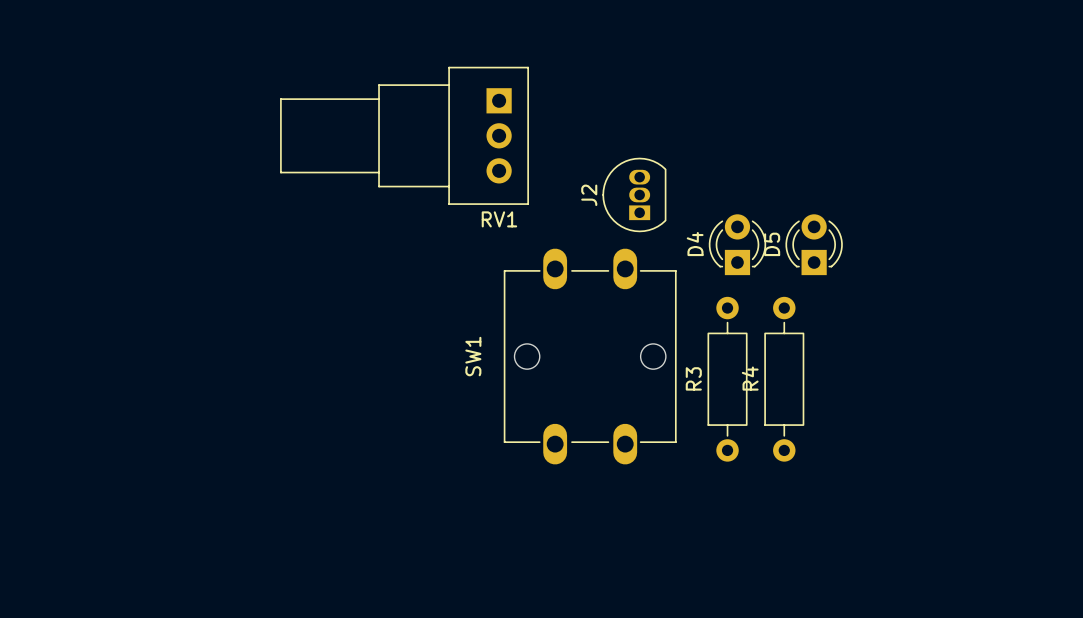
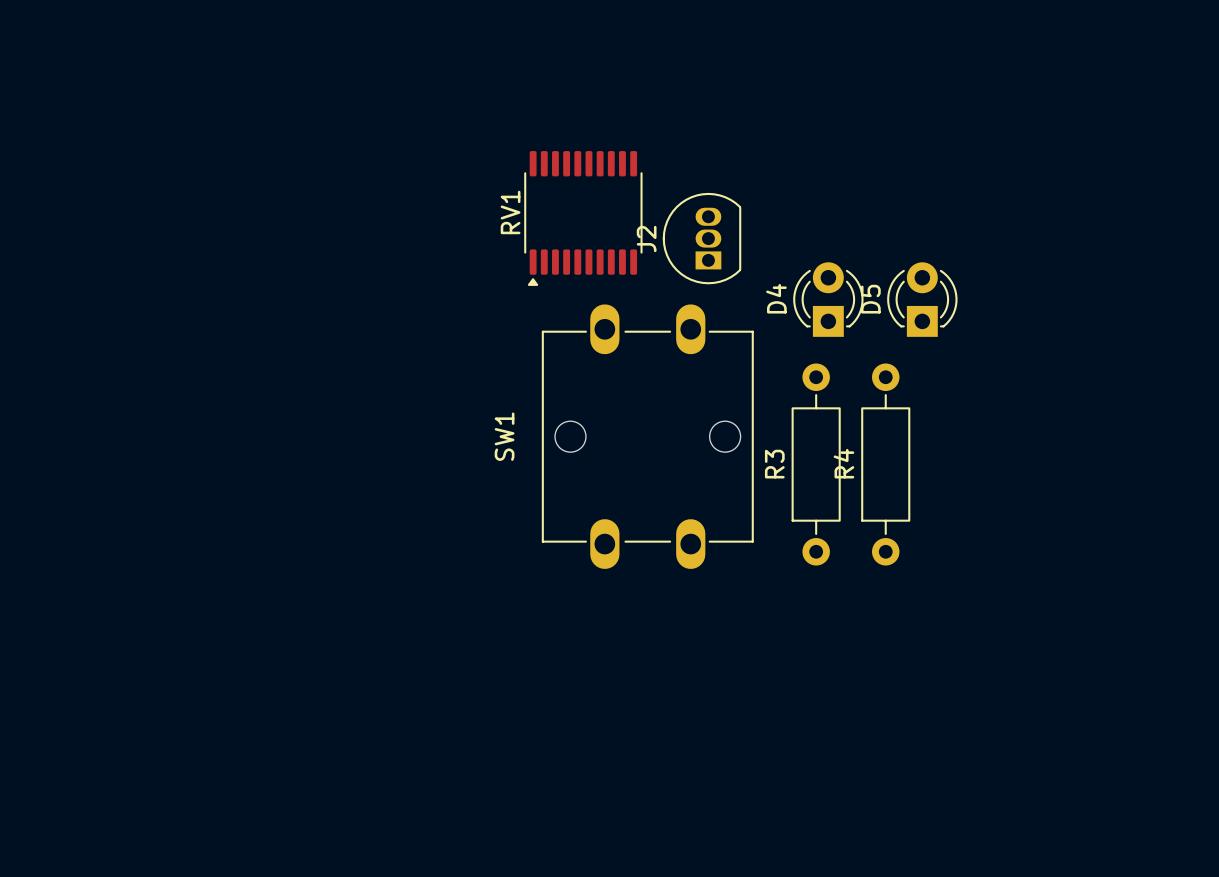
RV1 footprint: [280, 66, 529, 205] -> [524, 151, 643, 286]
RV1 name position: RV1 (499, 219) -> RV1 (510, 212)

